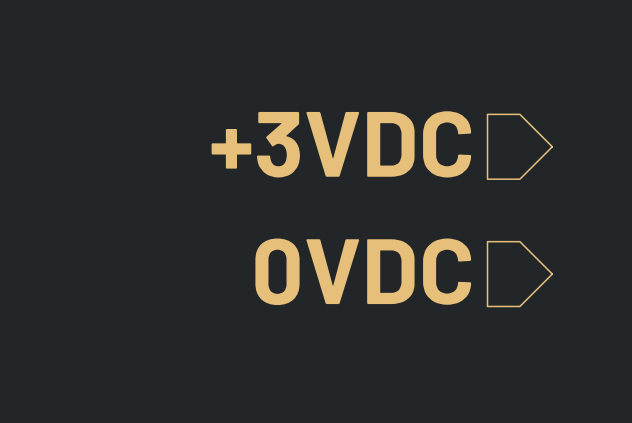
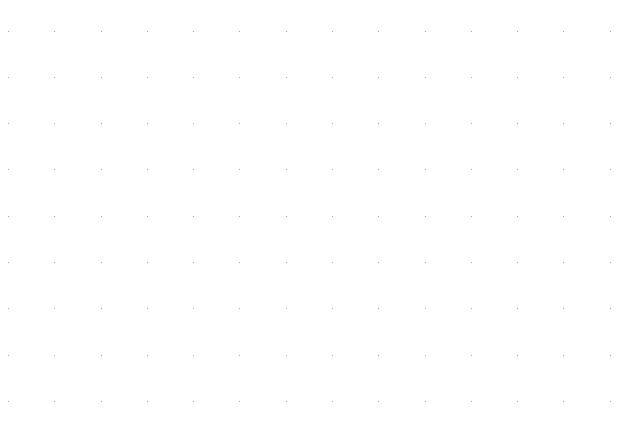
hierarchical label: +3VDC (341, 144) -> none
hierarchical label: 0VDC (363, 271) -> none

